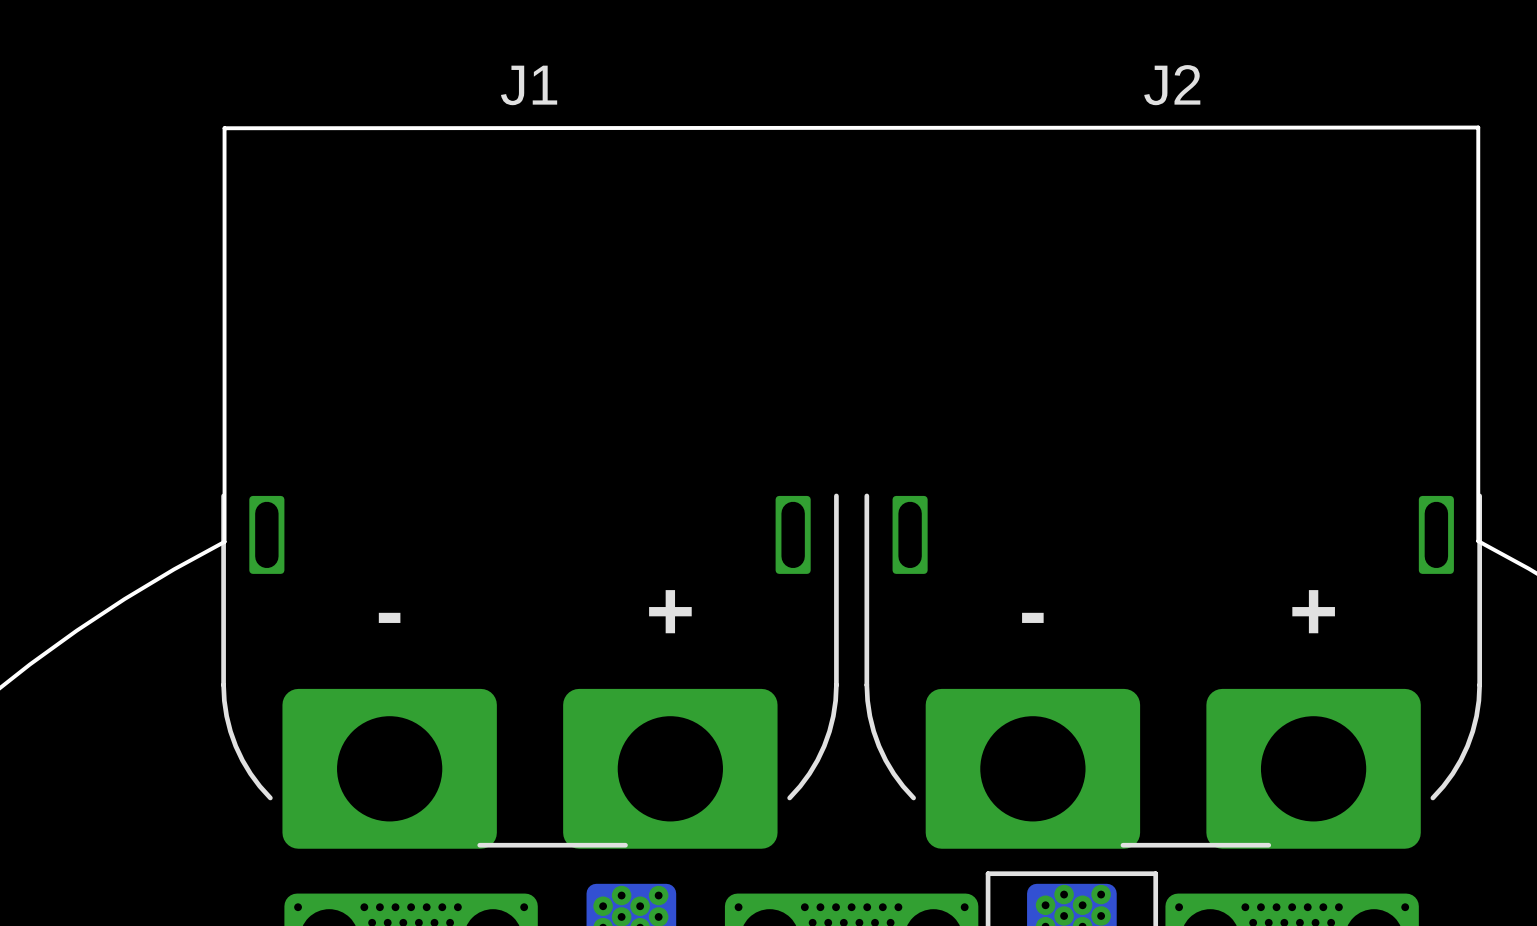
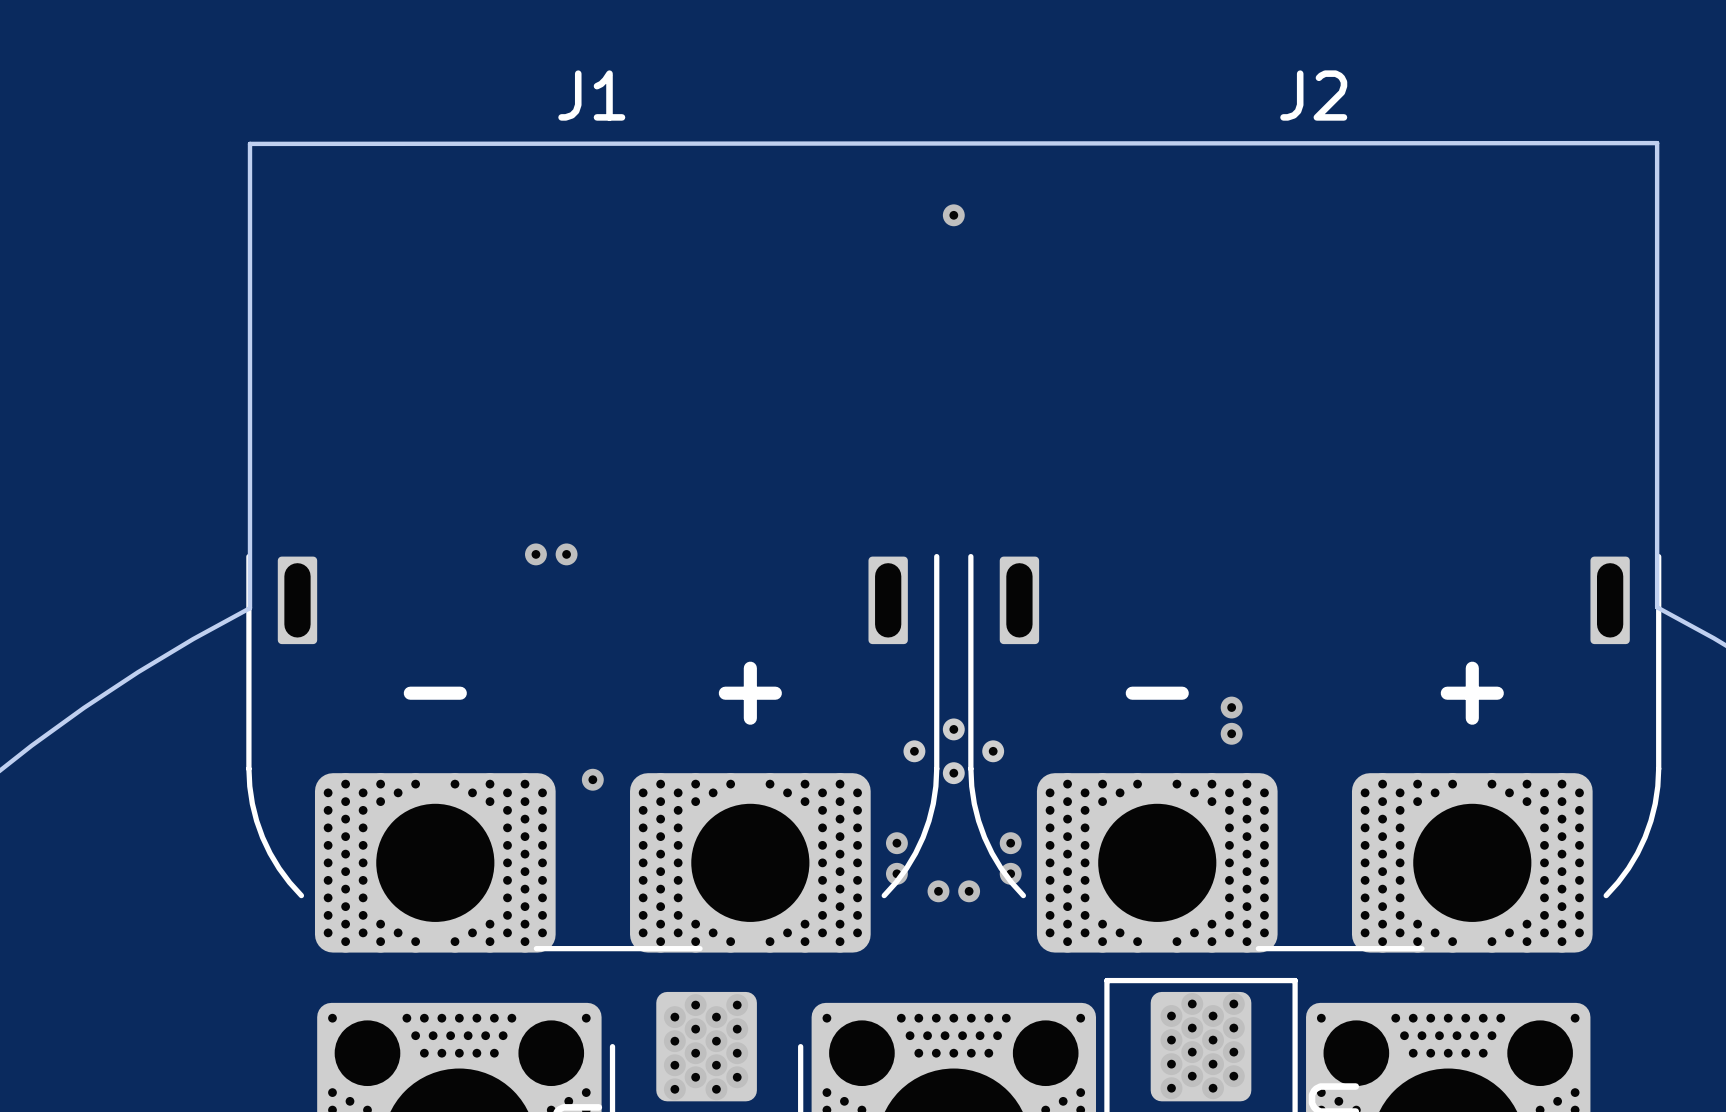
via: none -> (953, 215)
J1 footprint: [221, 493, 839, 849] -> [246, 553, 940, 953]
via: none -> (535, 554)
via: none -> (566, 554)
J2 footprint: [864, 493, 1482, 849] -> [968, 553, 1662, 953]
via: none -> (1231, 707)
via: none -> (1231, 733)
part: none -> (953, 751)
via: none -> (592, 779)
via: none -> (896, 843)
via: none -> (1010, 843)
via: none -> (896, 873)
via: none -> (1010, 873)
via: none -> (938, 891)
via: none -> (969, 891)

